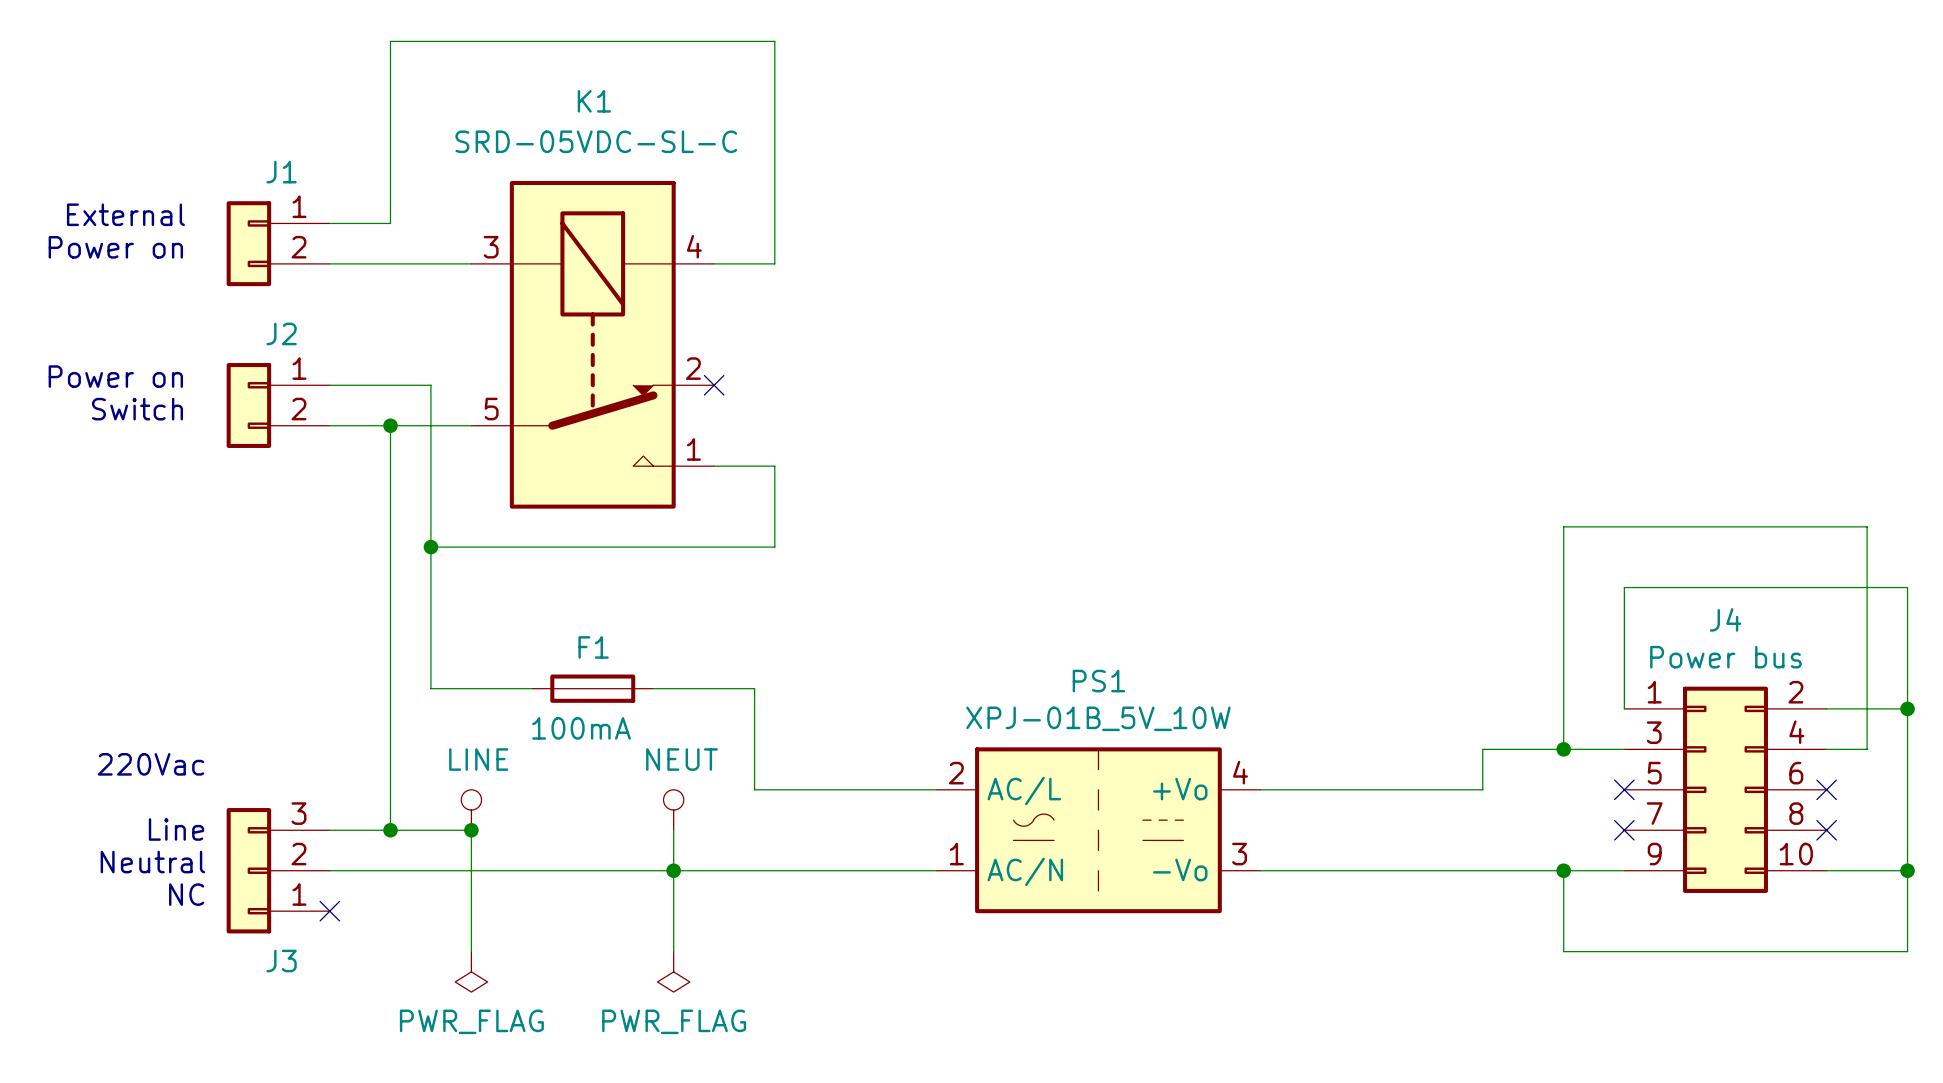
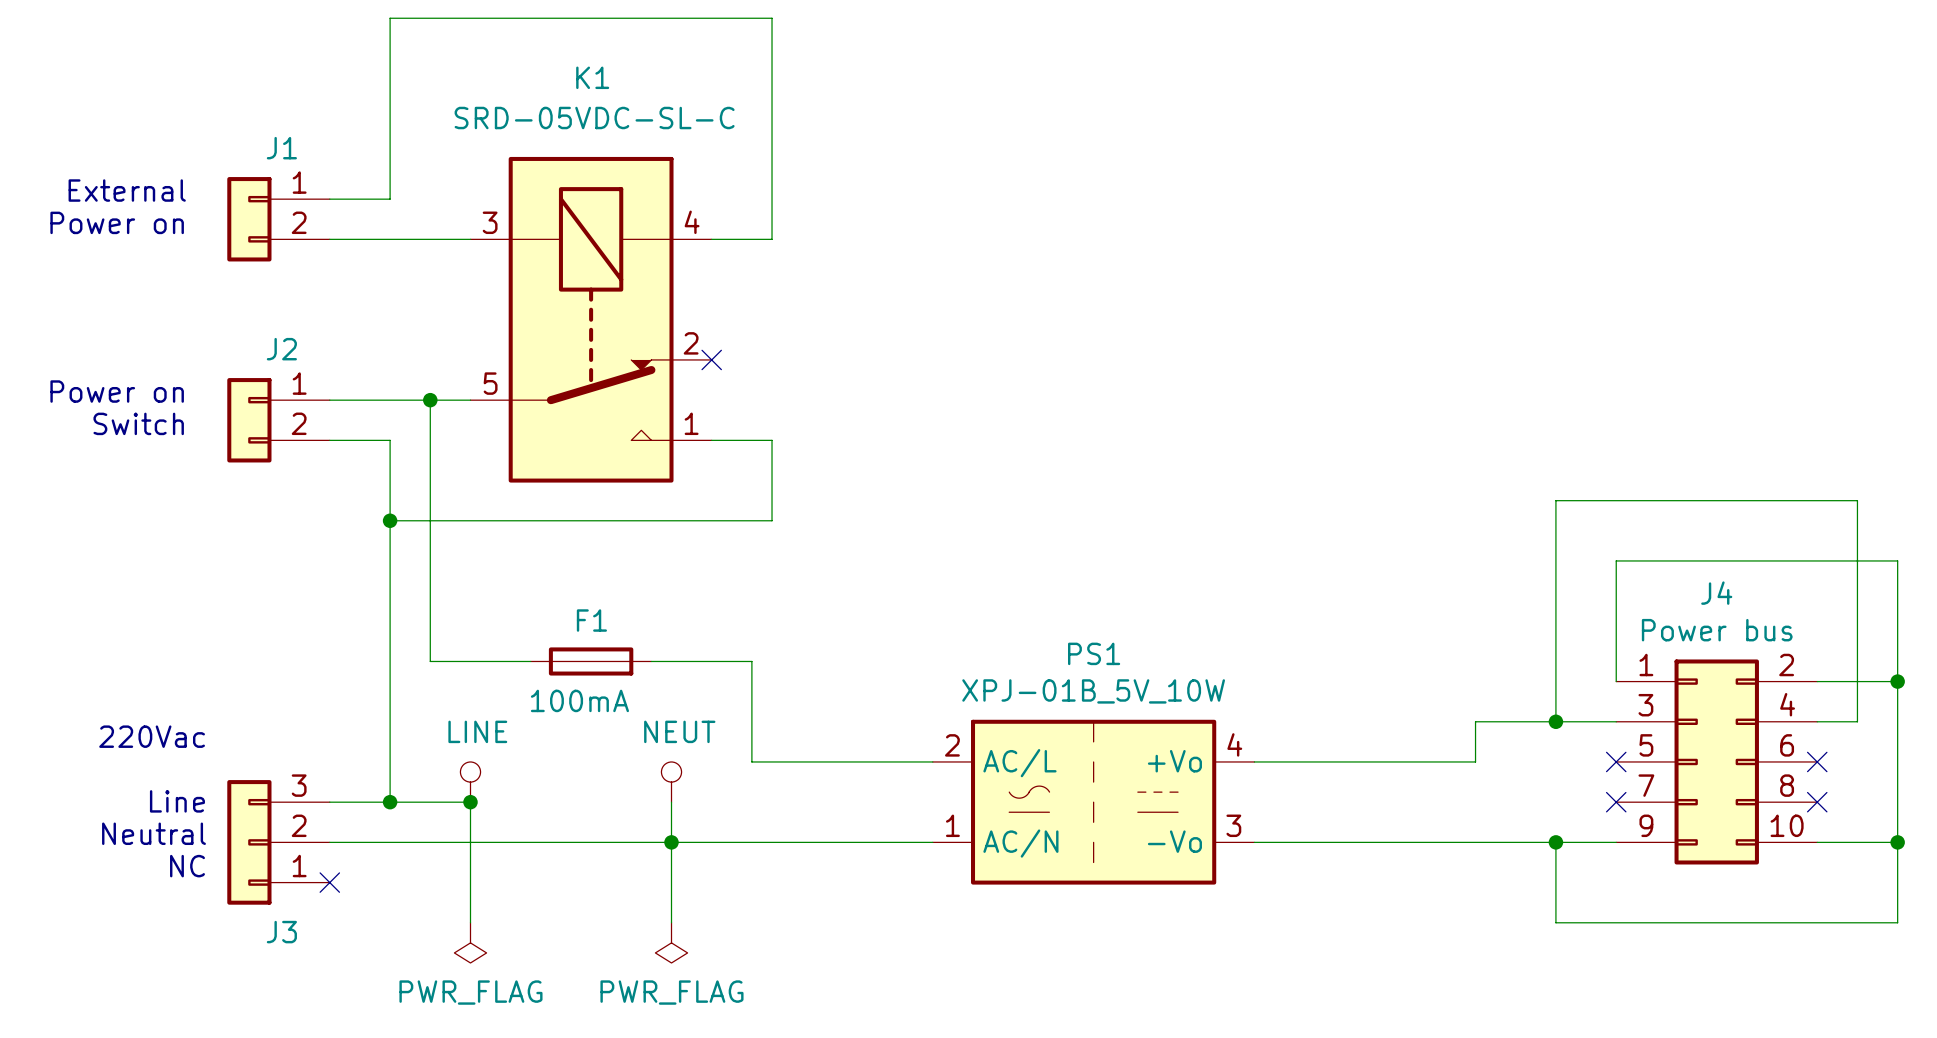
text position: Power on (115, 376) -> Power on (117, 391)
wire: (329, 385) (430, 385) (430, 425) -> none
J2 position: (278, 405) -> (278, 420)
text position: Switch (137, 409) -> Switch (138, 423)
wire: (390, 425) (390, 466) -> (329, 440) (390, 440)
junction position: (390, 425) -> (430, 400)
wire: none -> (390, 520) (430, 520)
junction position: (430, 547) -> (390, 520)

